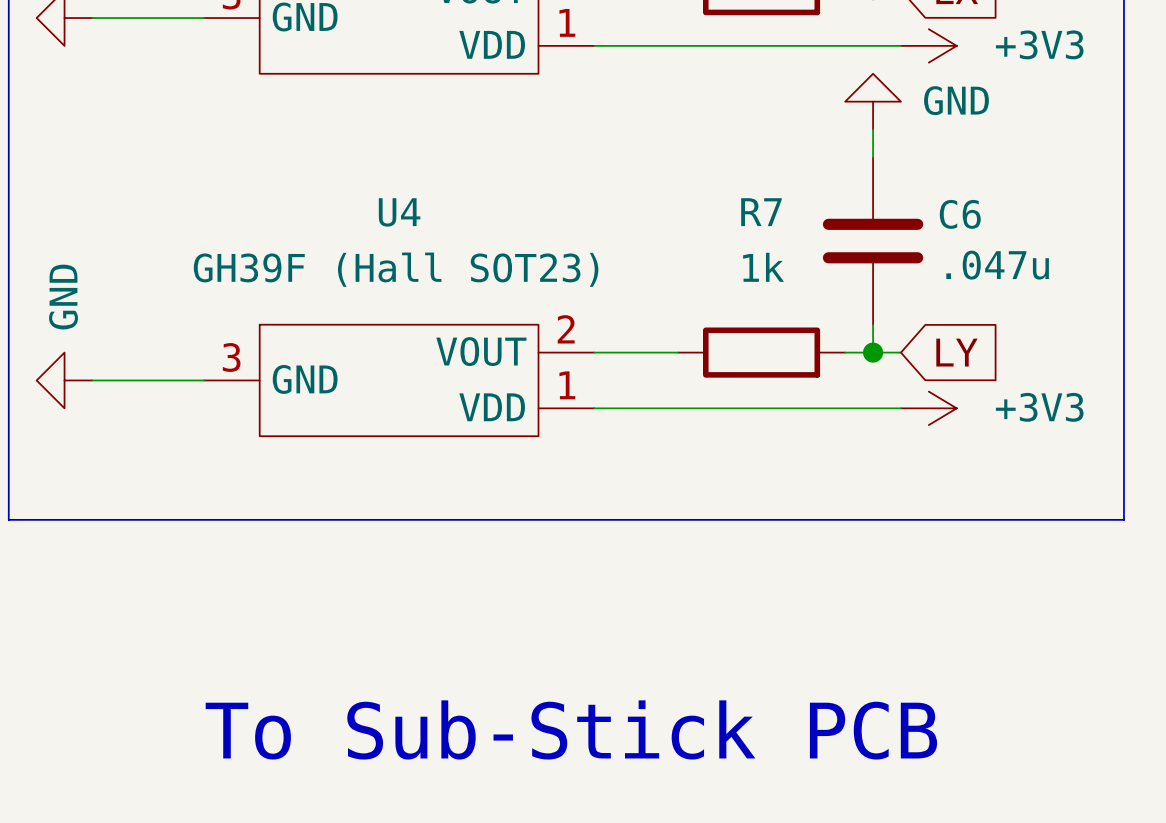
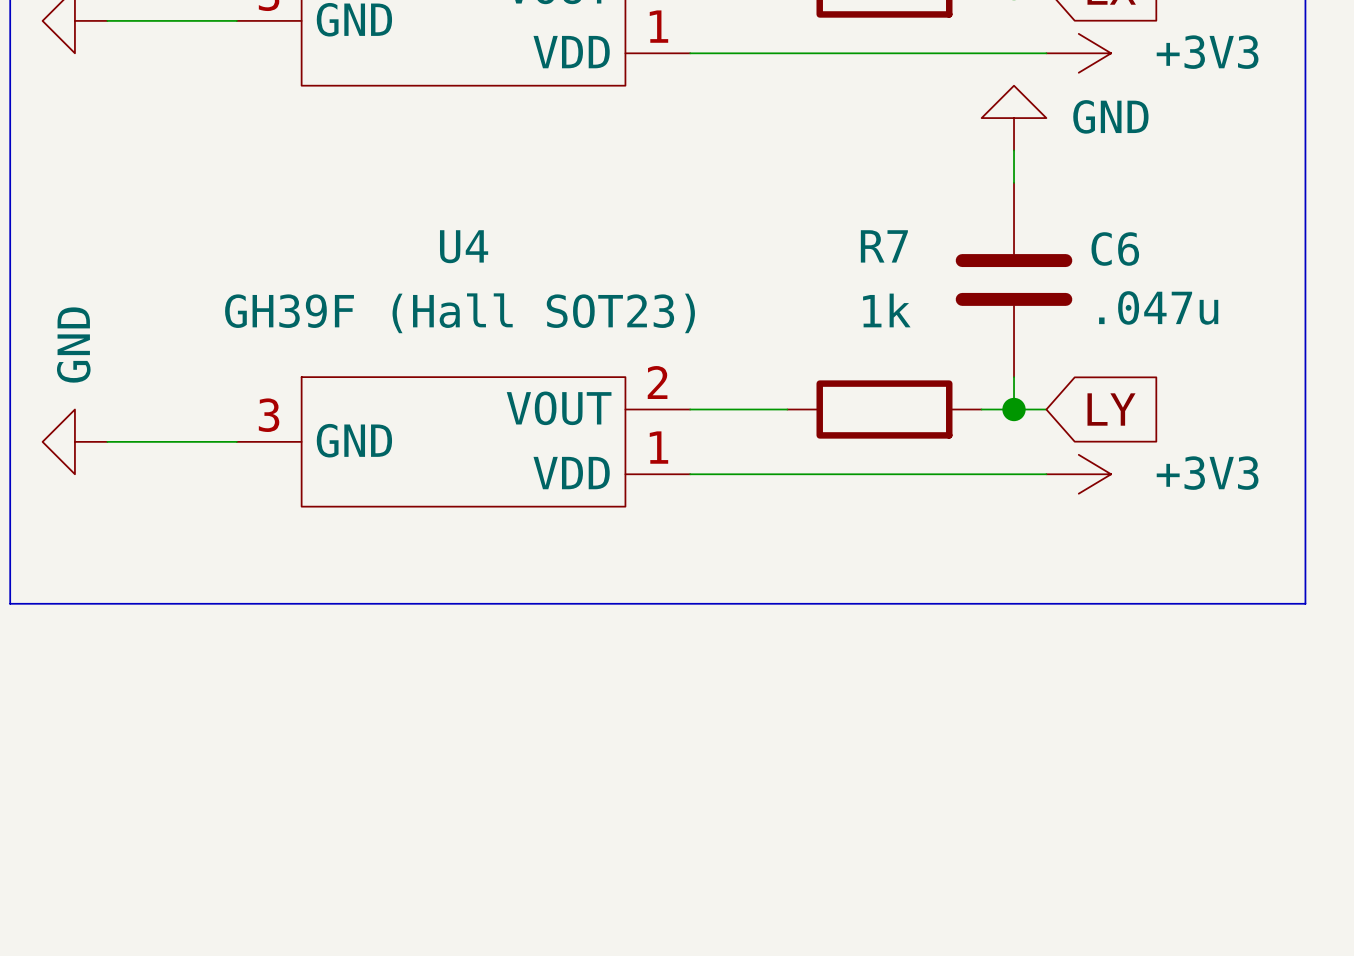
text: To Sub-Stick PCB (571, 729) -> none

